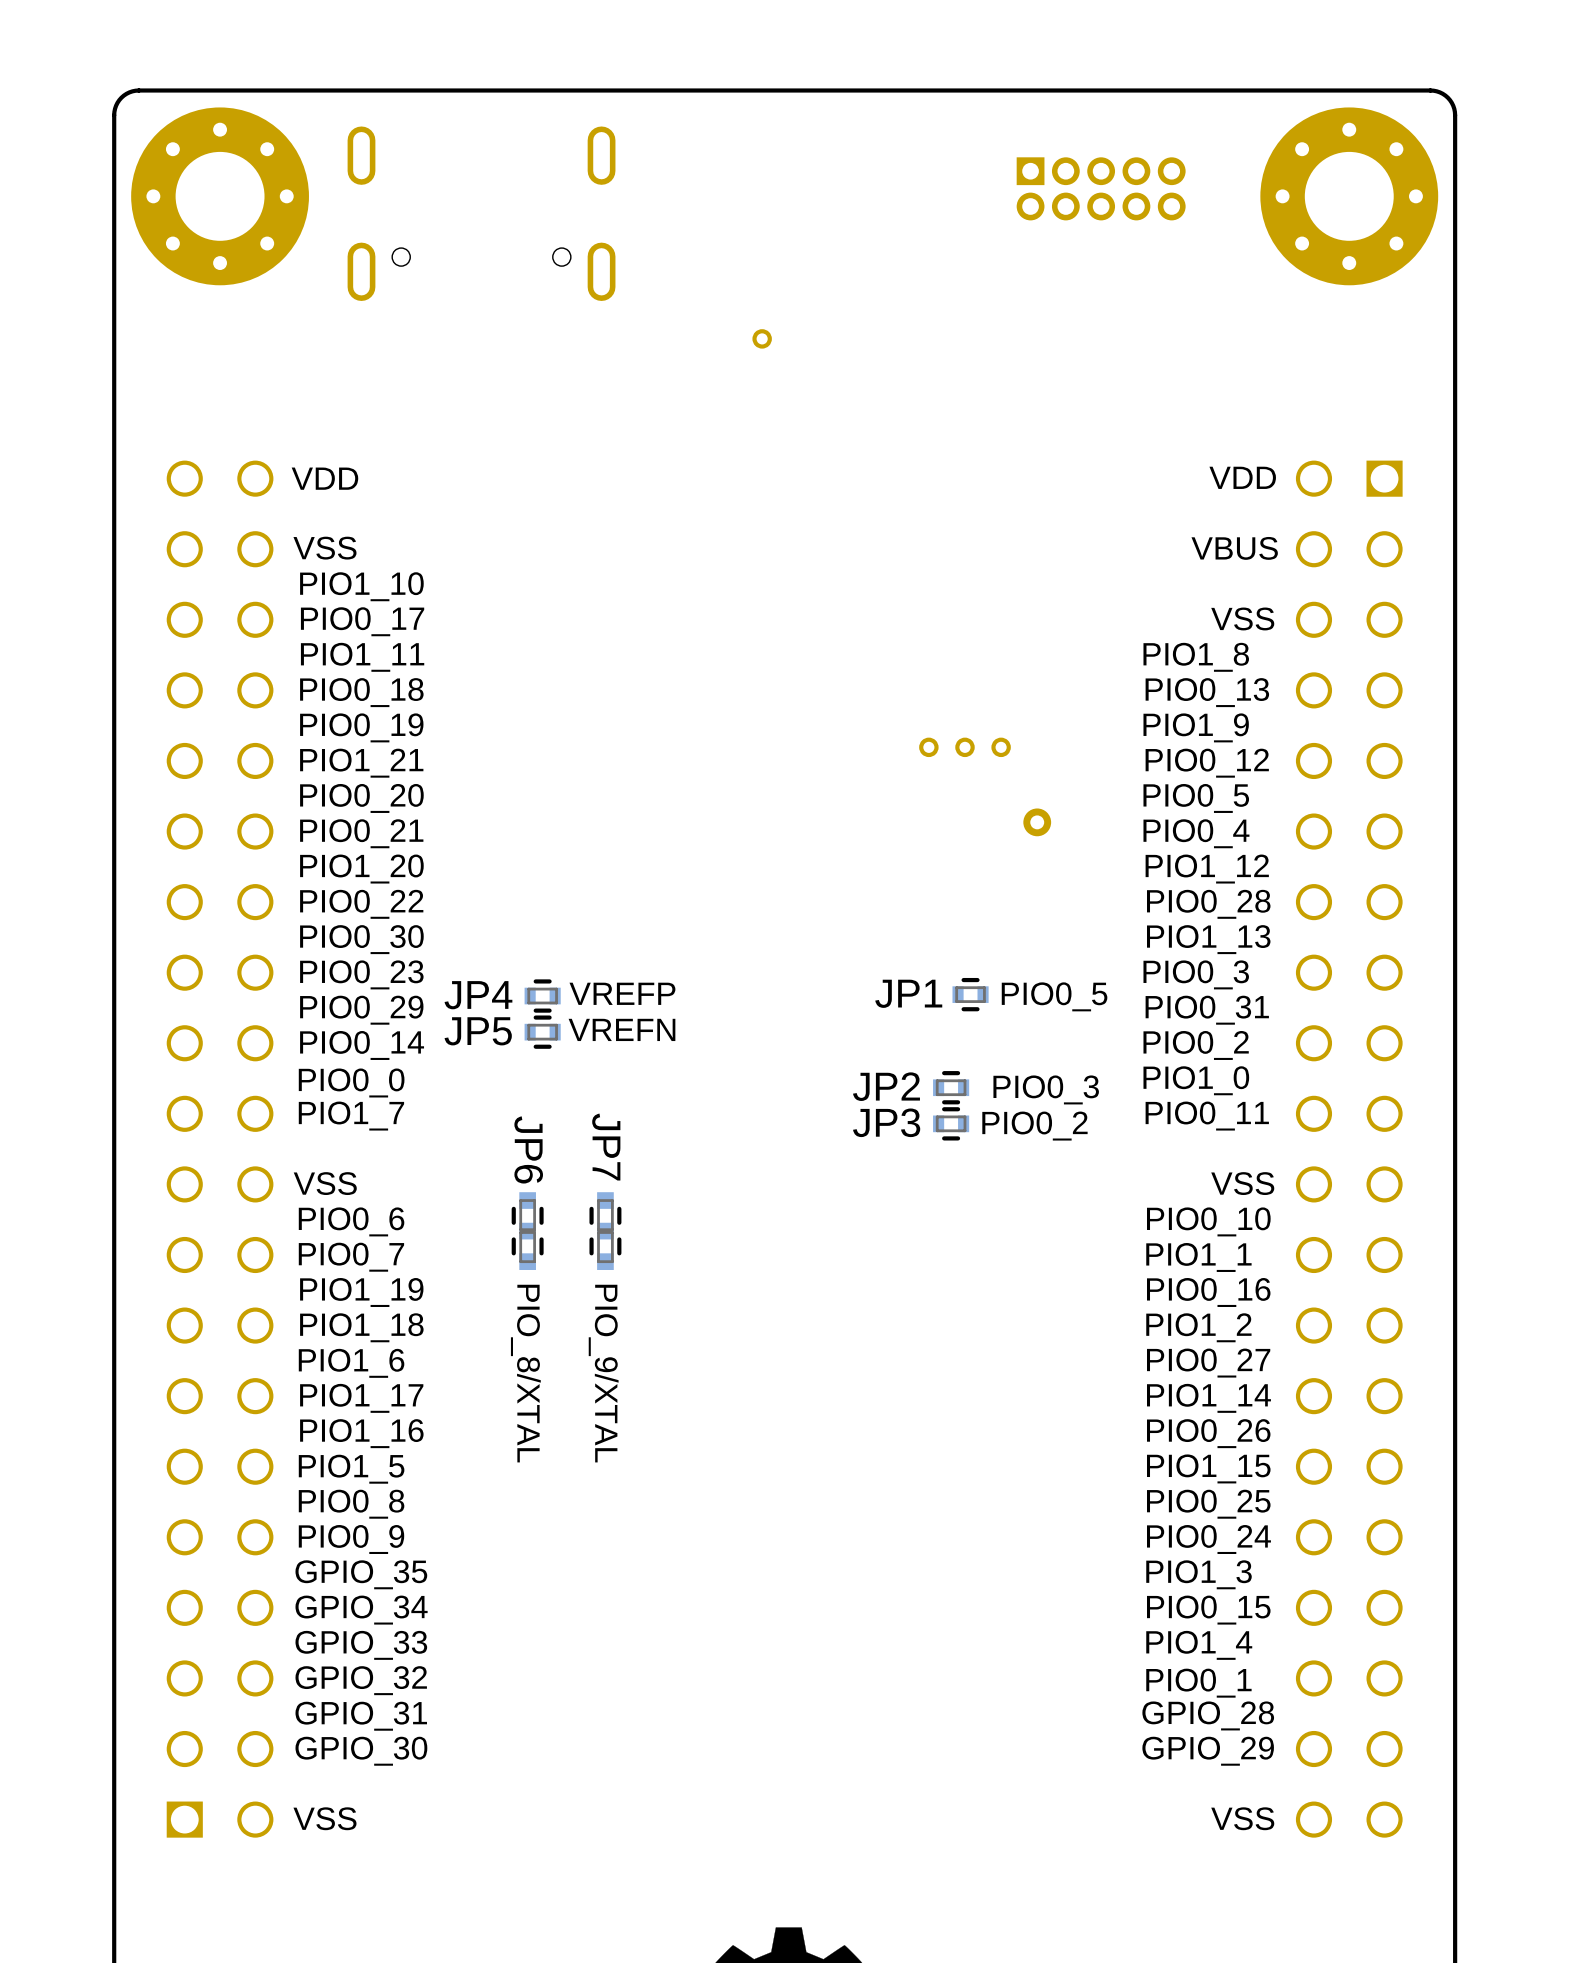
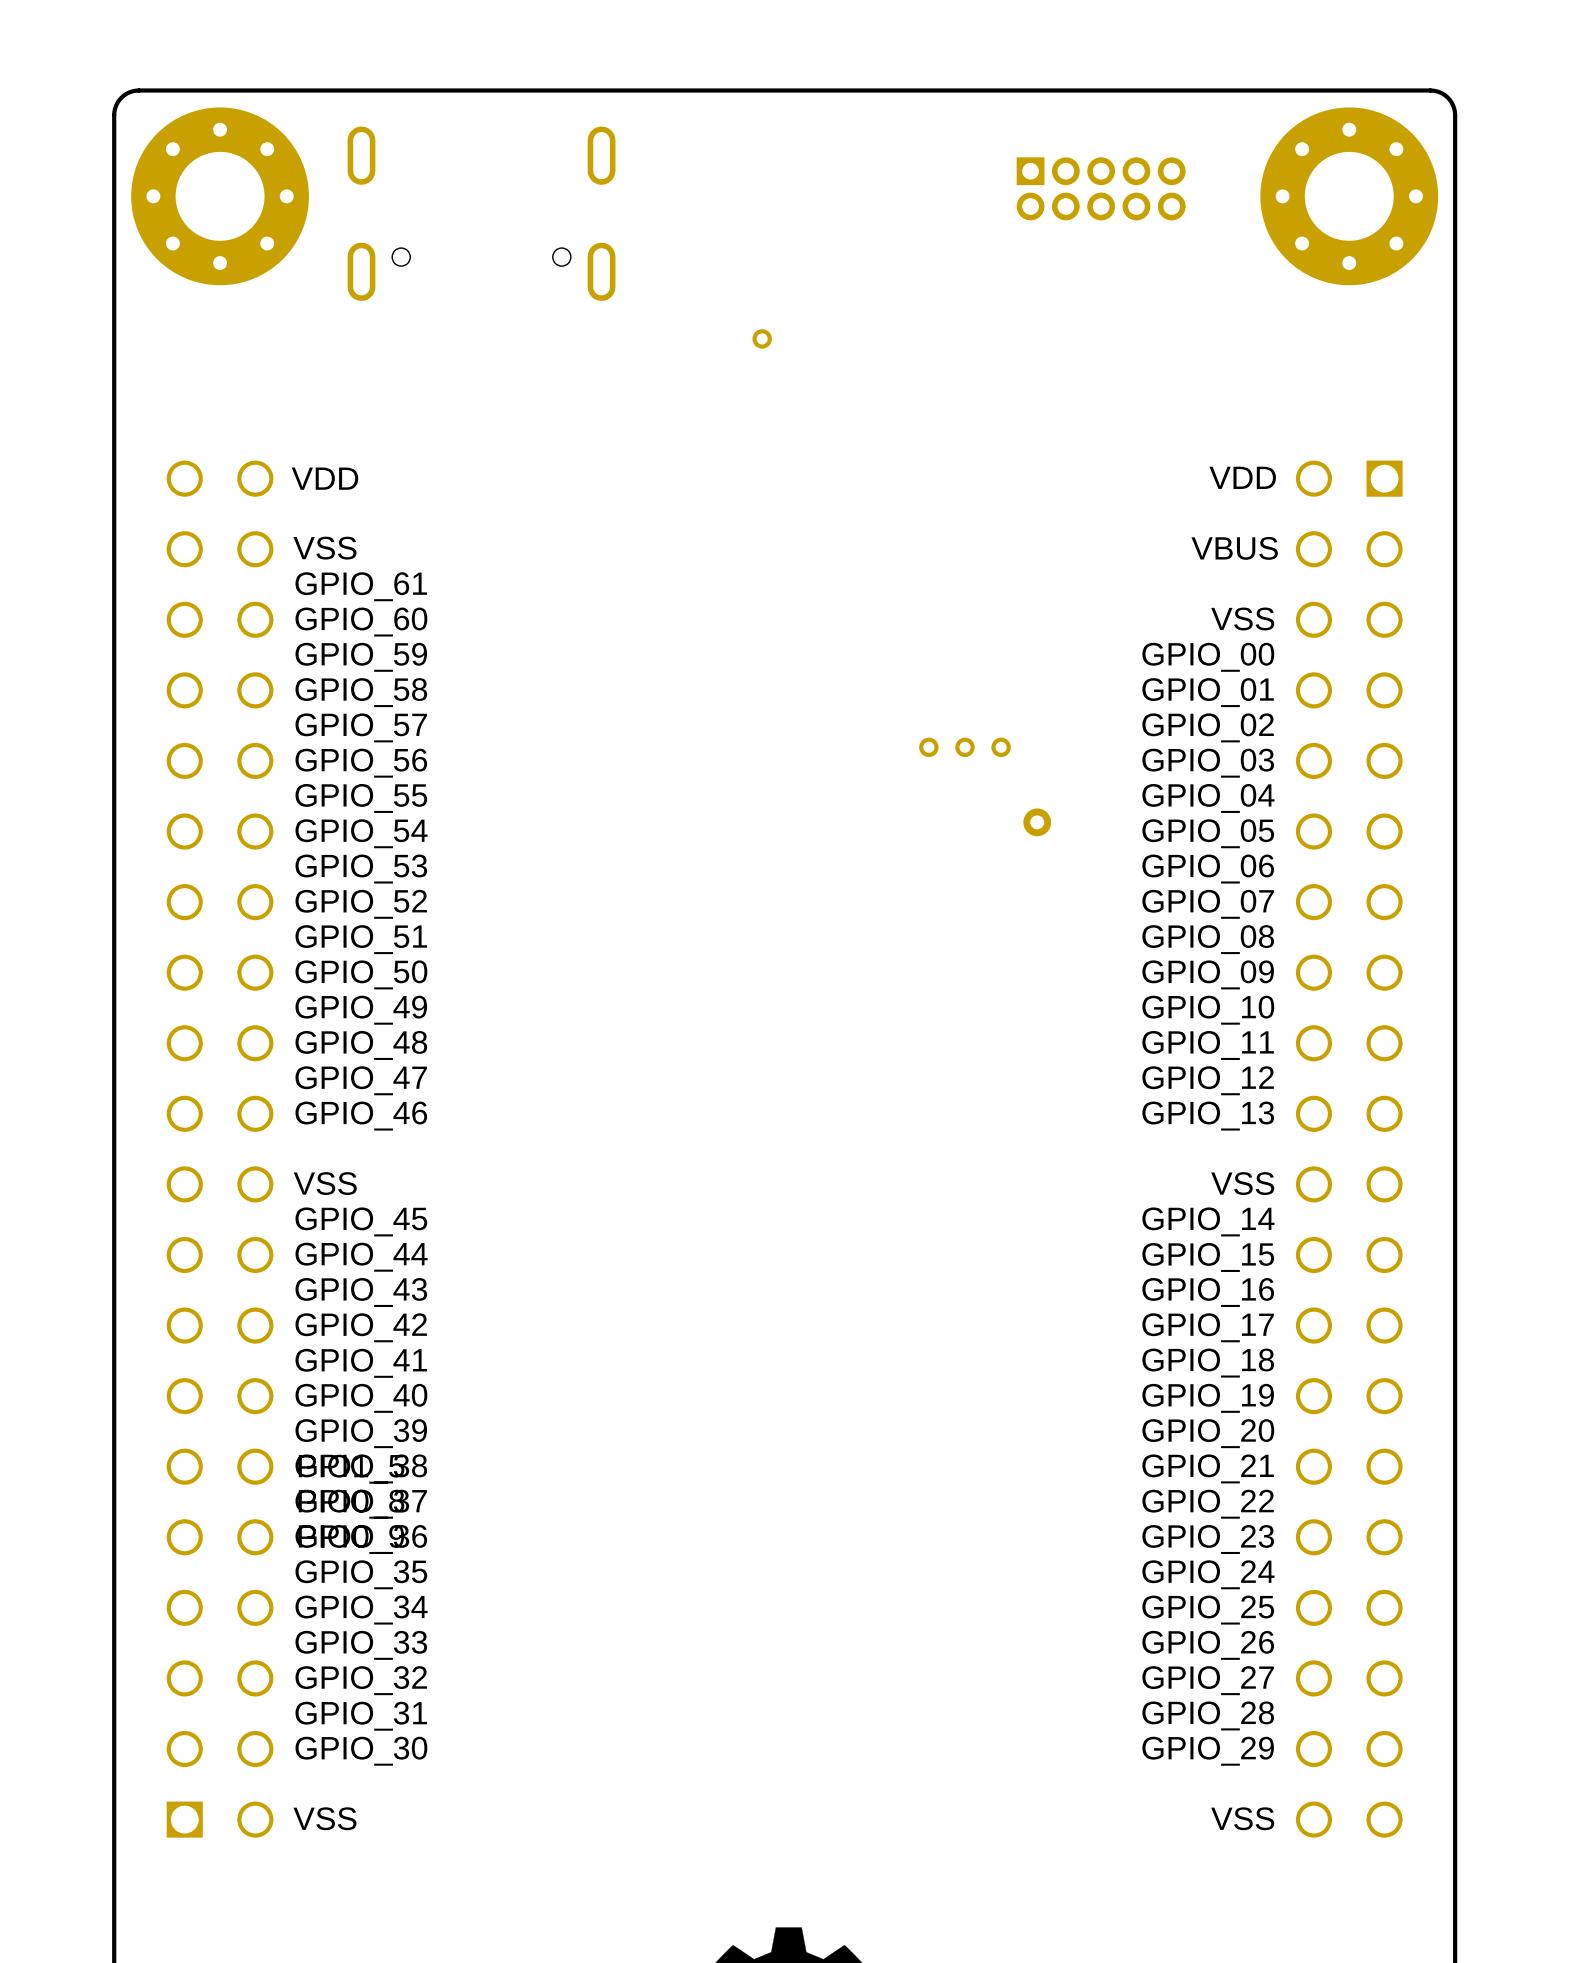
part footprint: [166, 460, 274, 1838] -> [166, 460, 274, 1838]
part footprint: [1295, 460, 1403, 1838] -> [1295, 460, 1403, 1838]
JP1: PIO0_5 (970, 994) -> none
JP4: VREFP (542, 996) -> none
JP5: VREFN (542, 1032) -> none
JP2: PIO0_3 (951, 1087) -> none
JP3: PIO0_2 (951, 1123) -> none
JP6: PIO_8/XTAL (527, 1231) -> none
JP7: PIO_9/XTAL (605, 1231) -> none

